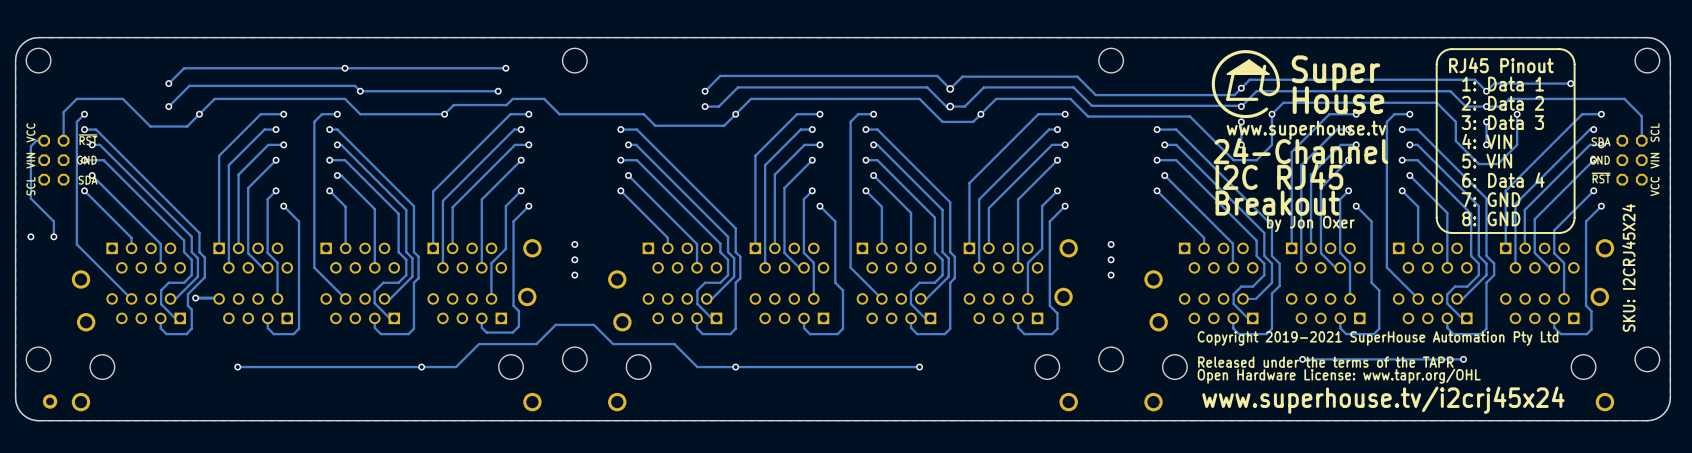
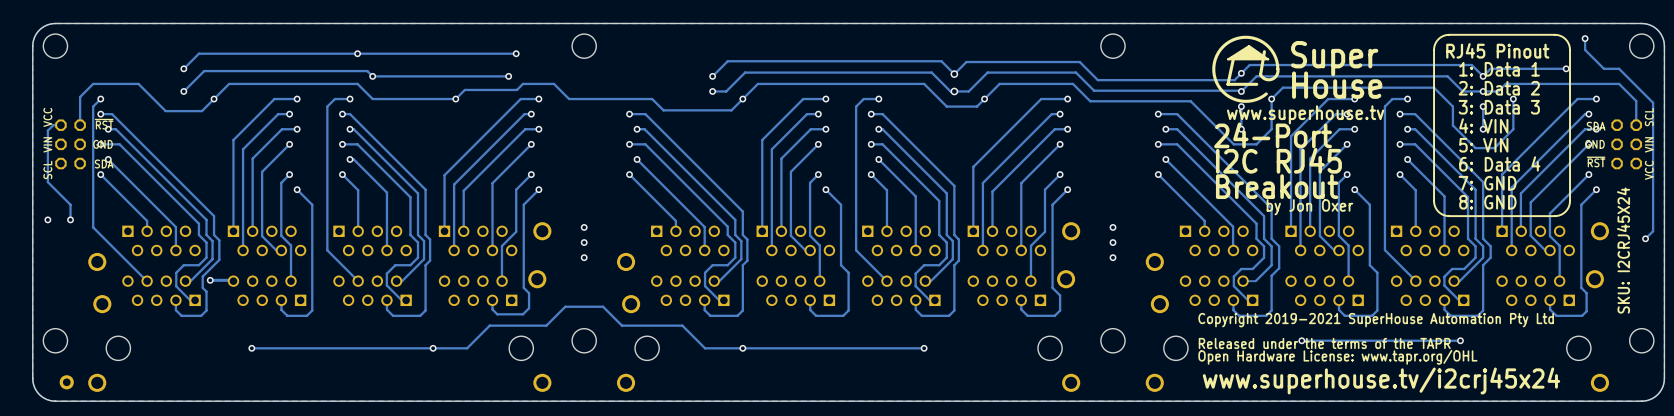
track: none -> (1585, 38) (1585, 49) (1604, 68) (1619, 68) (1653, 102) (1653, 231) (1645, 238)
via: none -> (1585, 38)
text: 24-Channel (1301, 151) -> 24-Port (1273, 135)
via: none -> (1645, 238)

